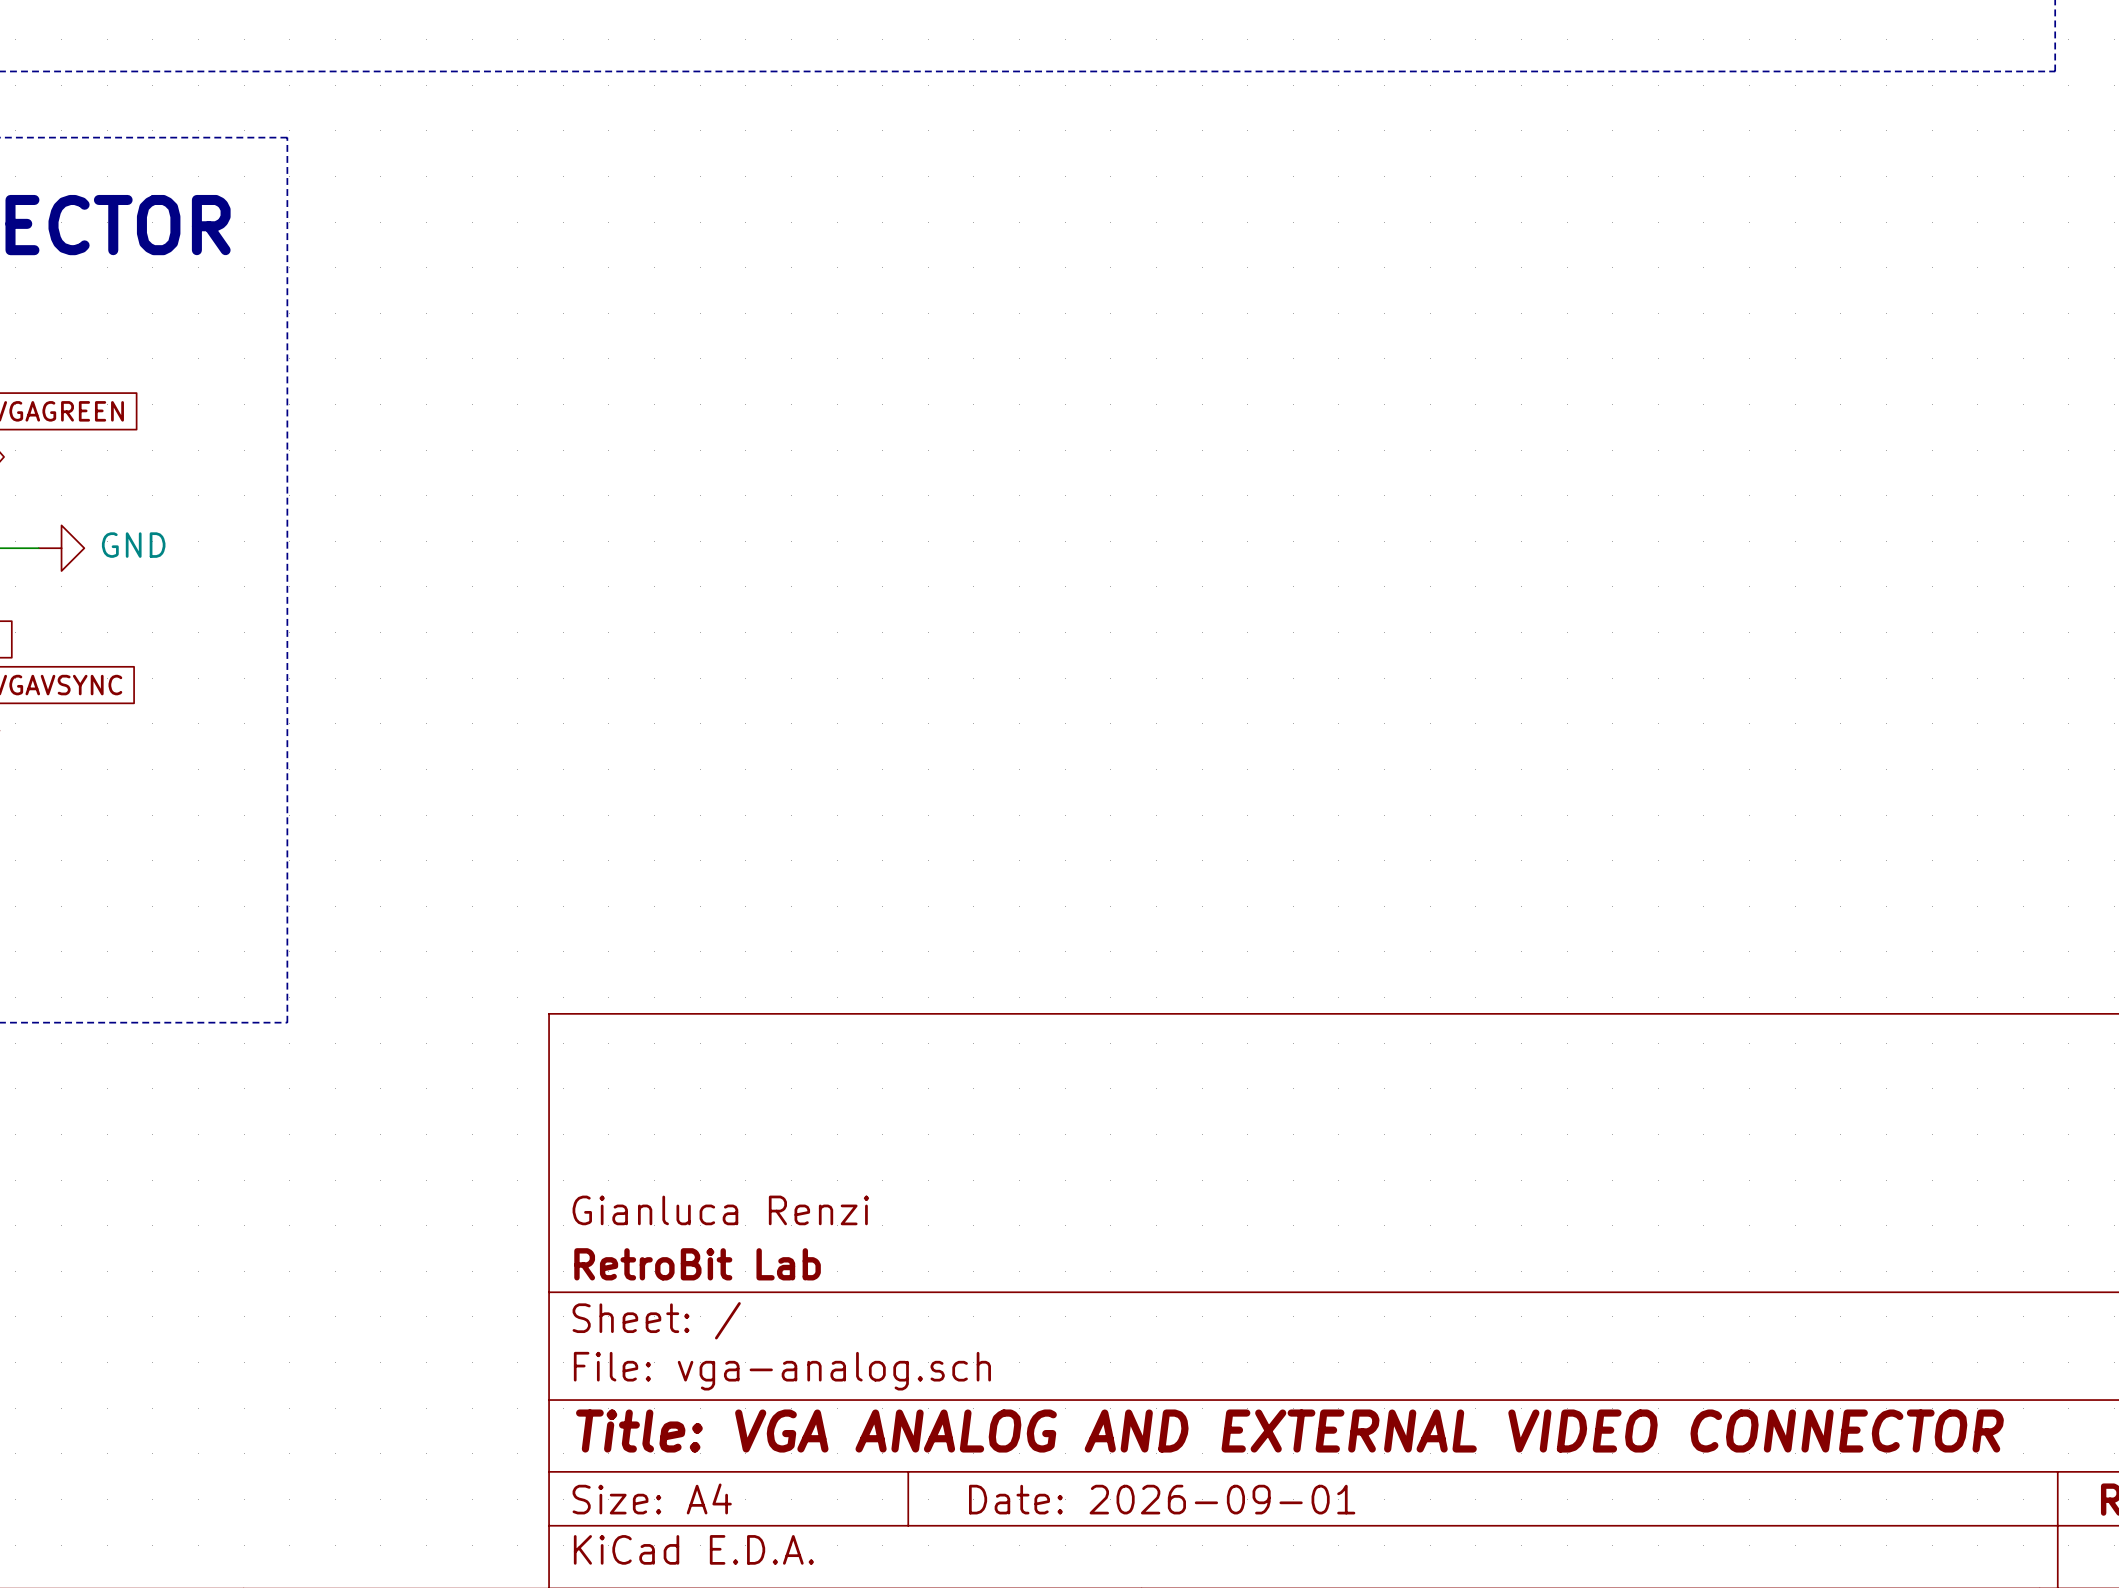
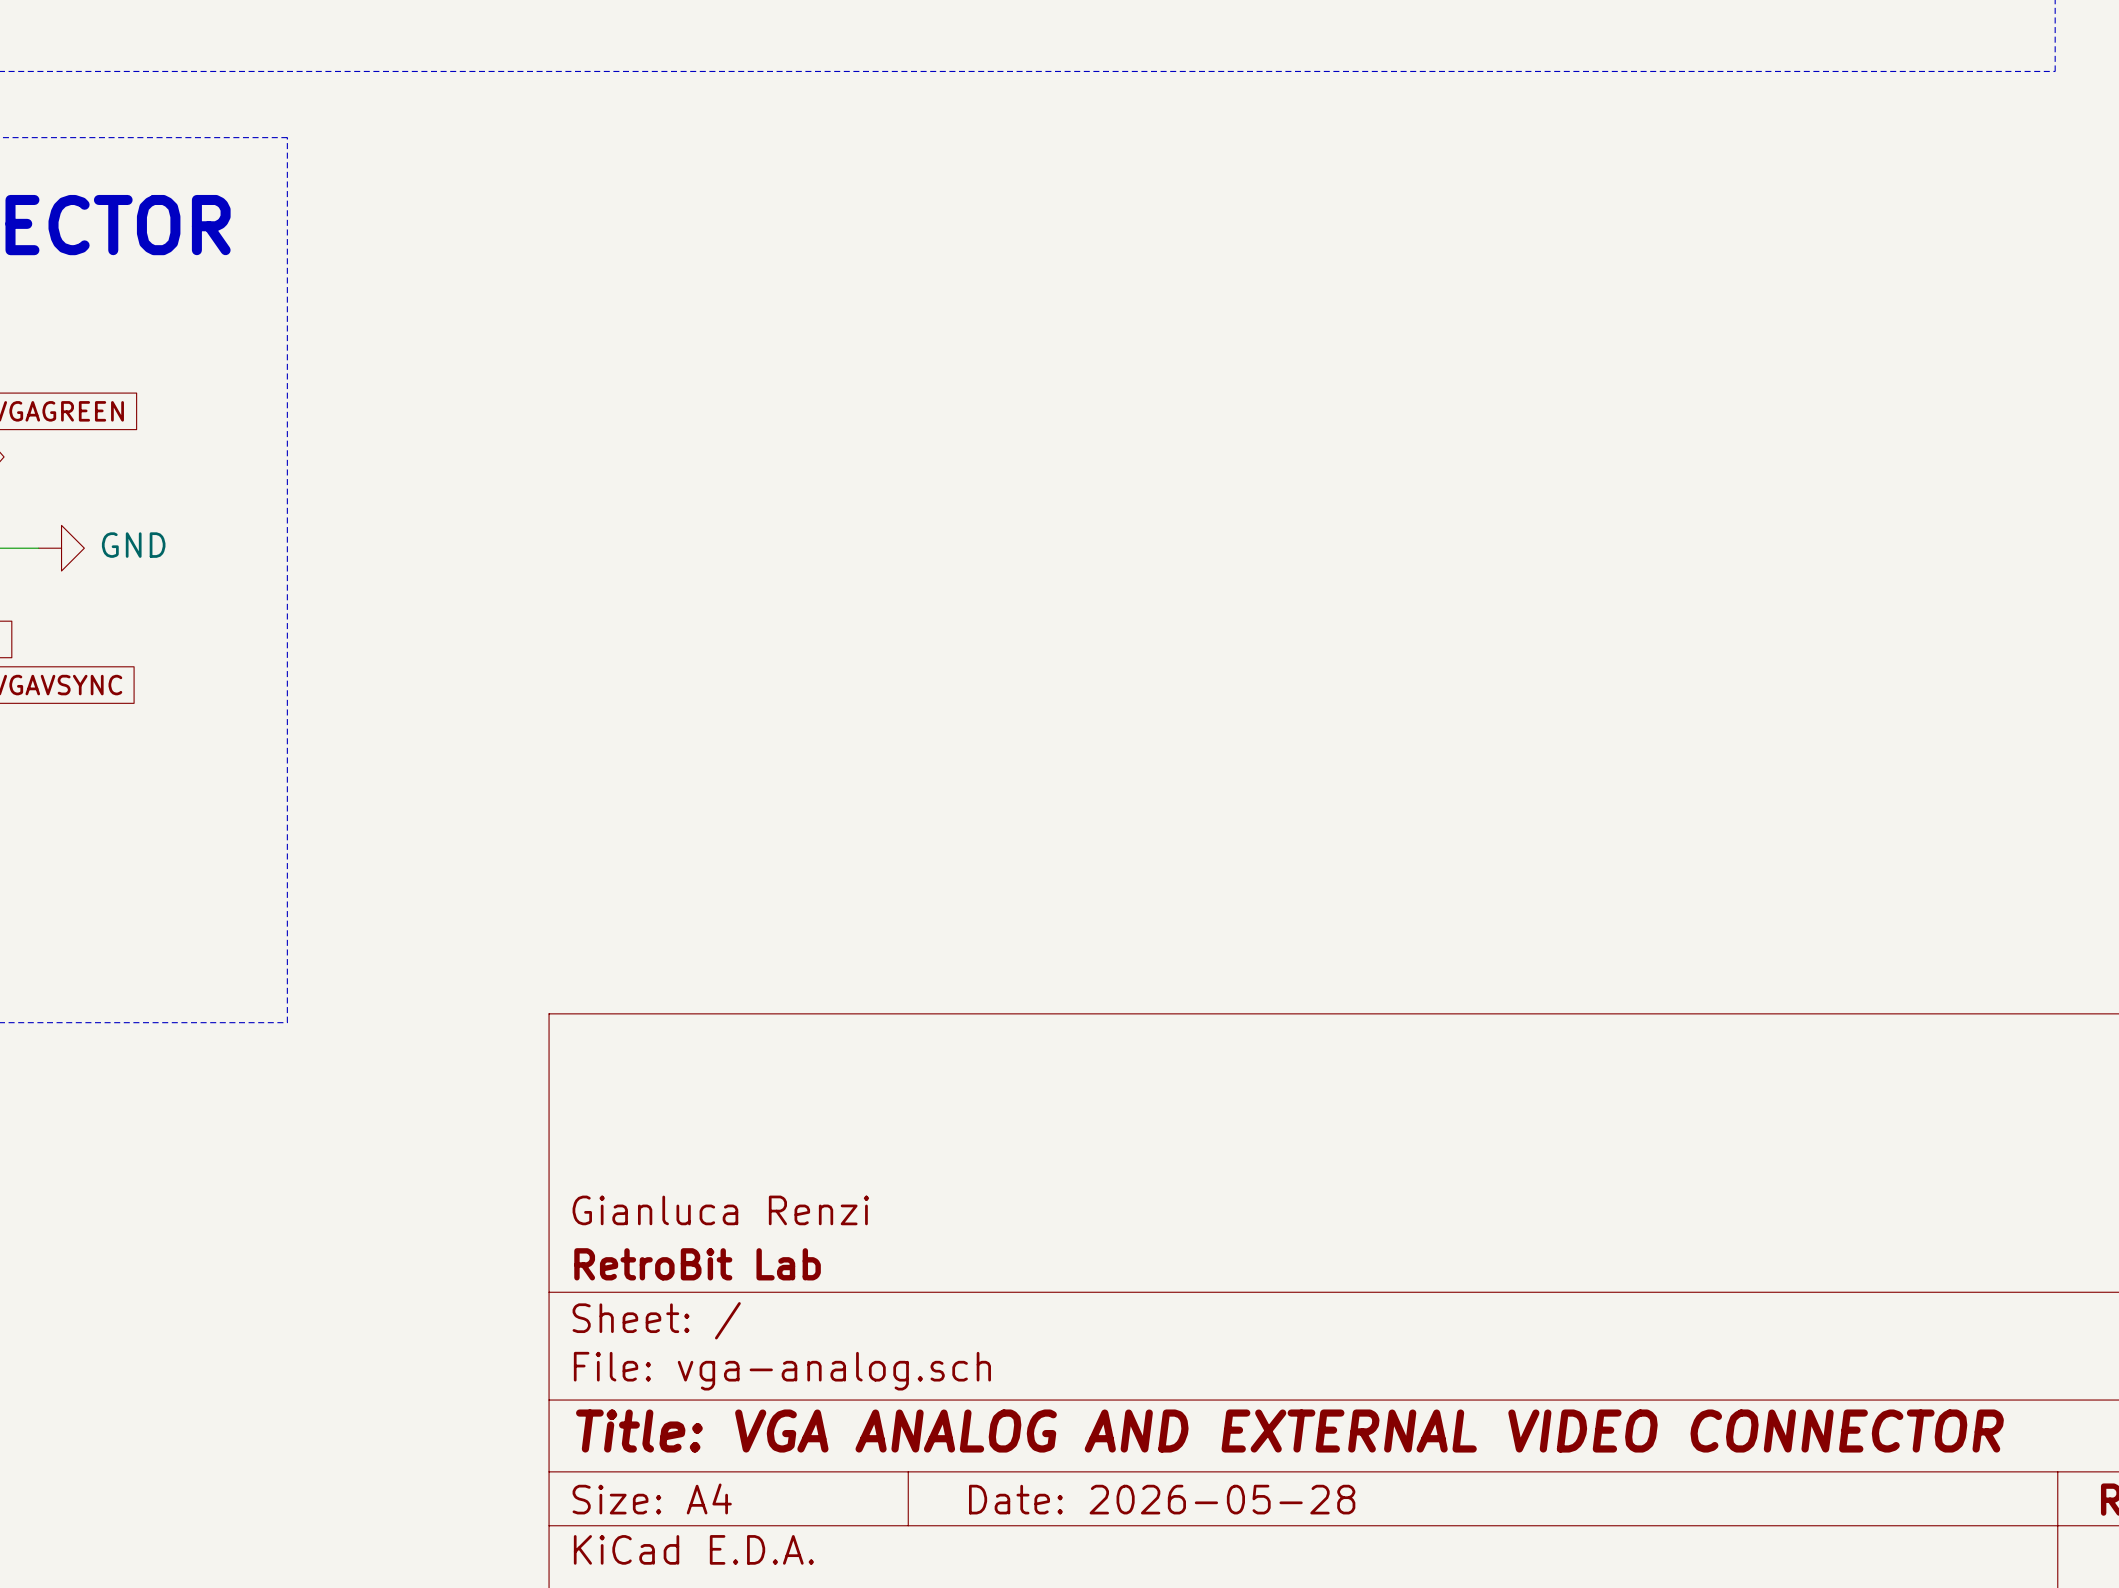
title block: Date: 2026-09-01 (1162, 1499) -> Date: 2026-05-28 (1162, 1499)

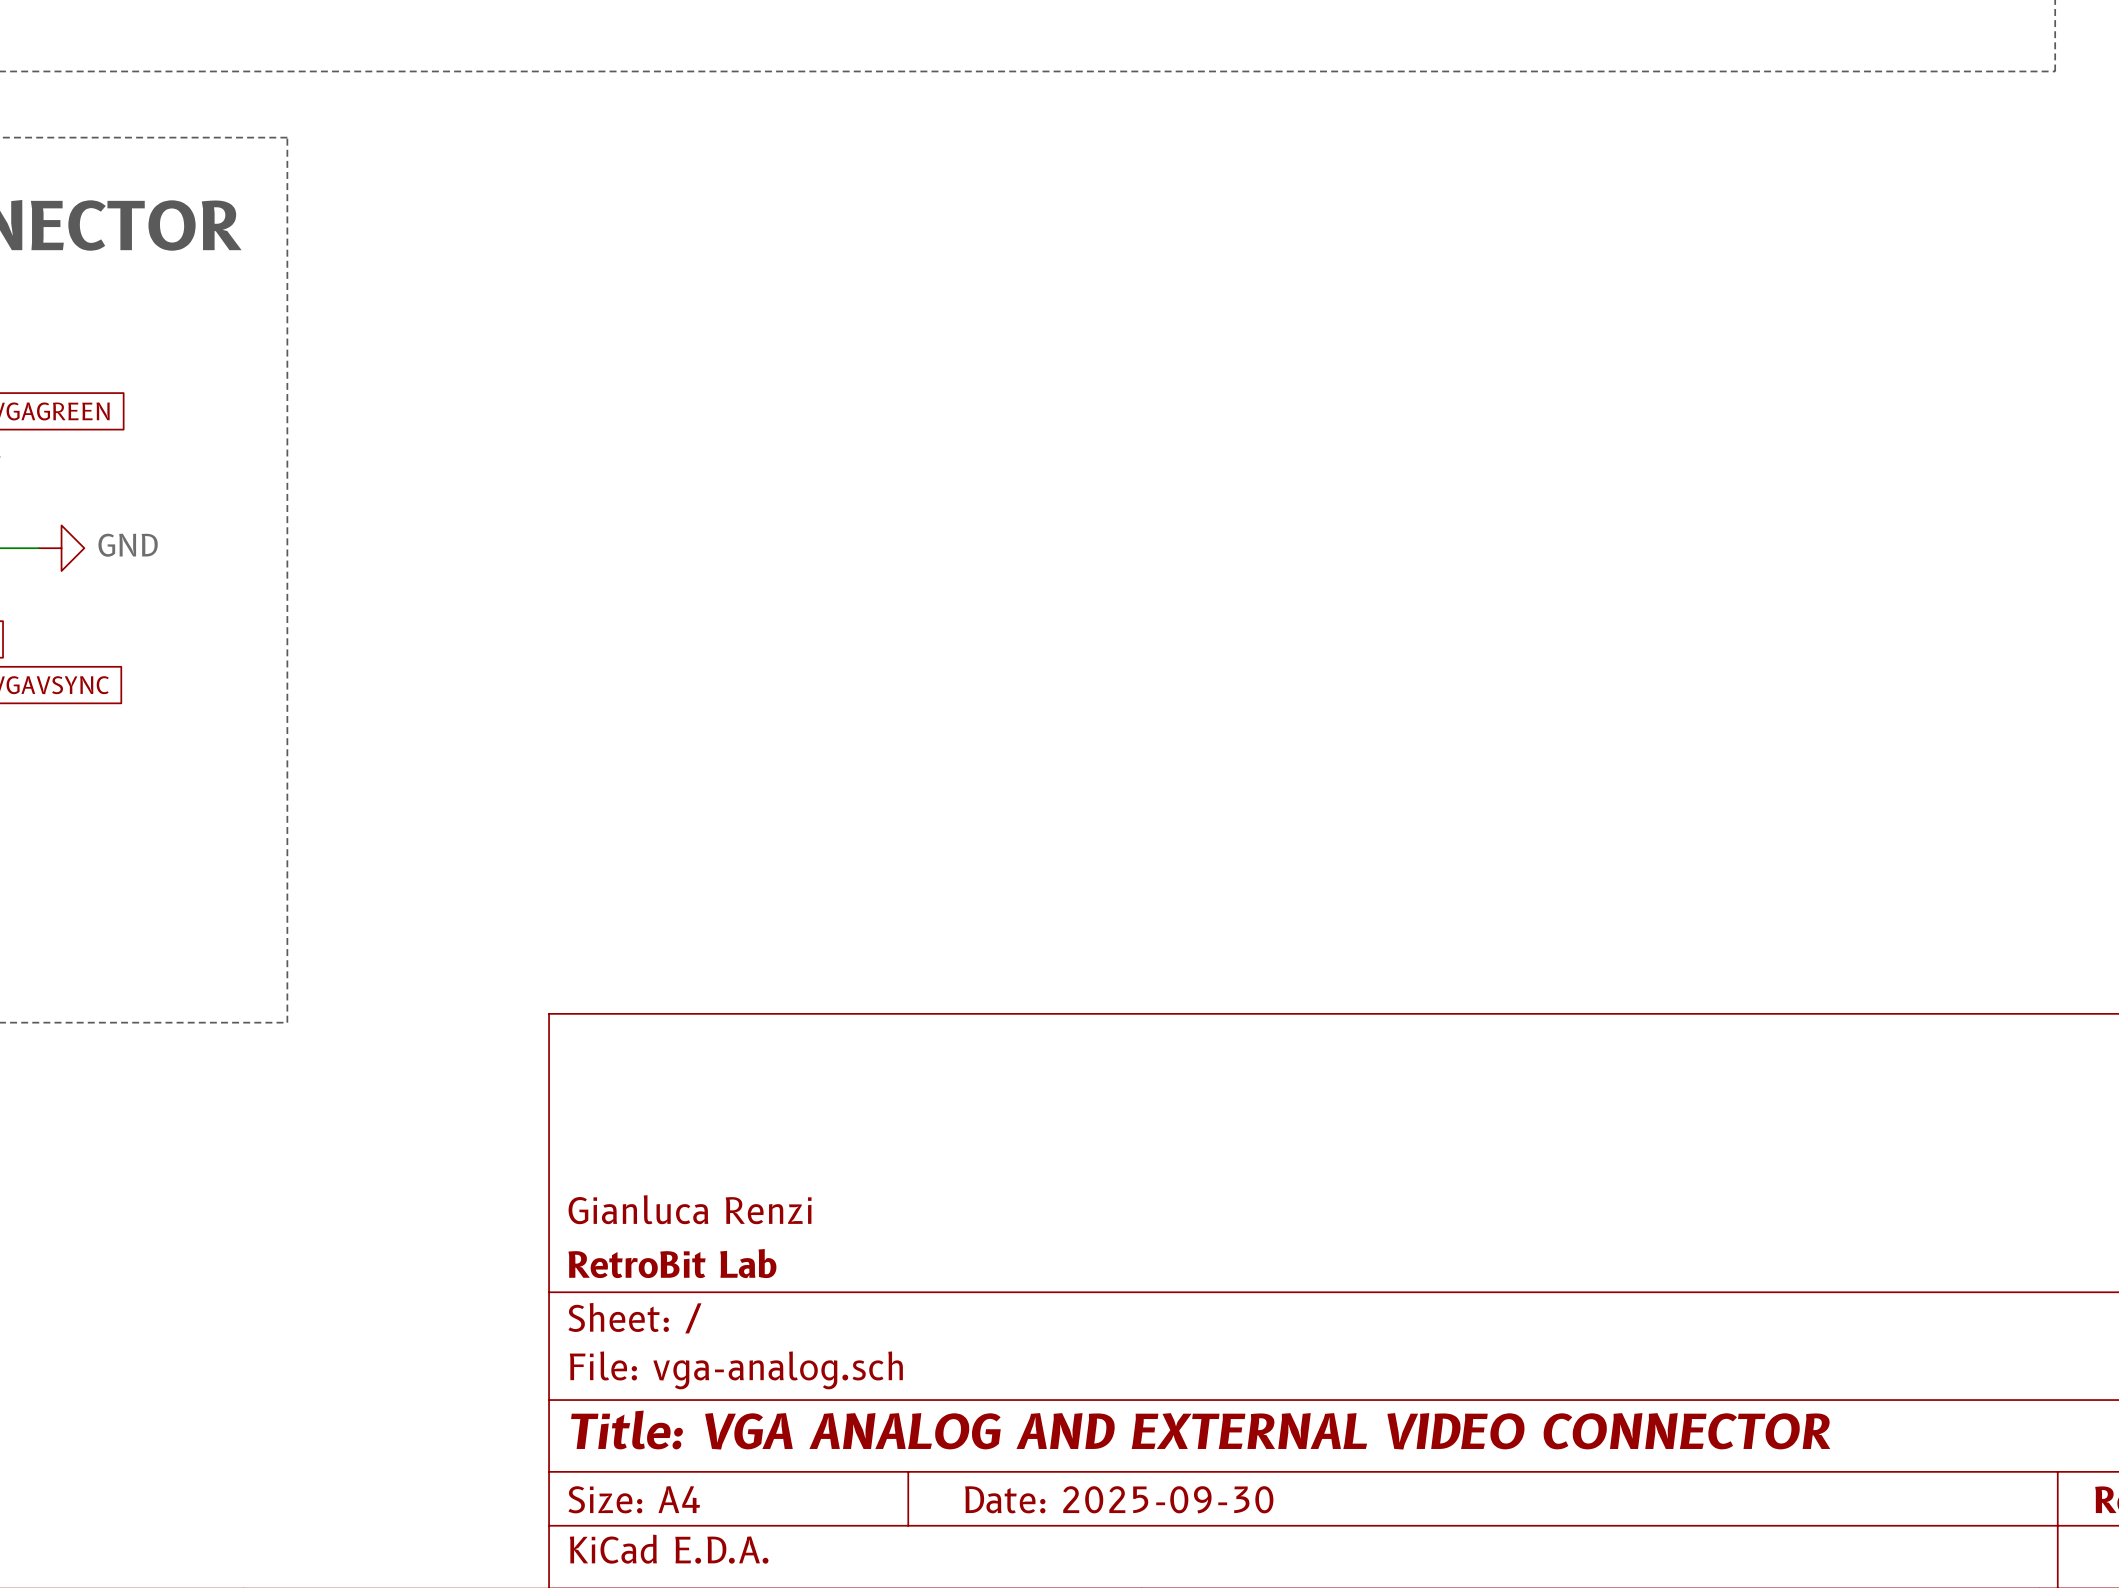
title block: Date: 2026-05-28 (1162, 1499) -> Date: 2025-09-30 (1119, 1499)

